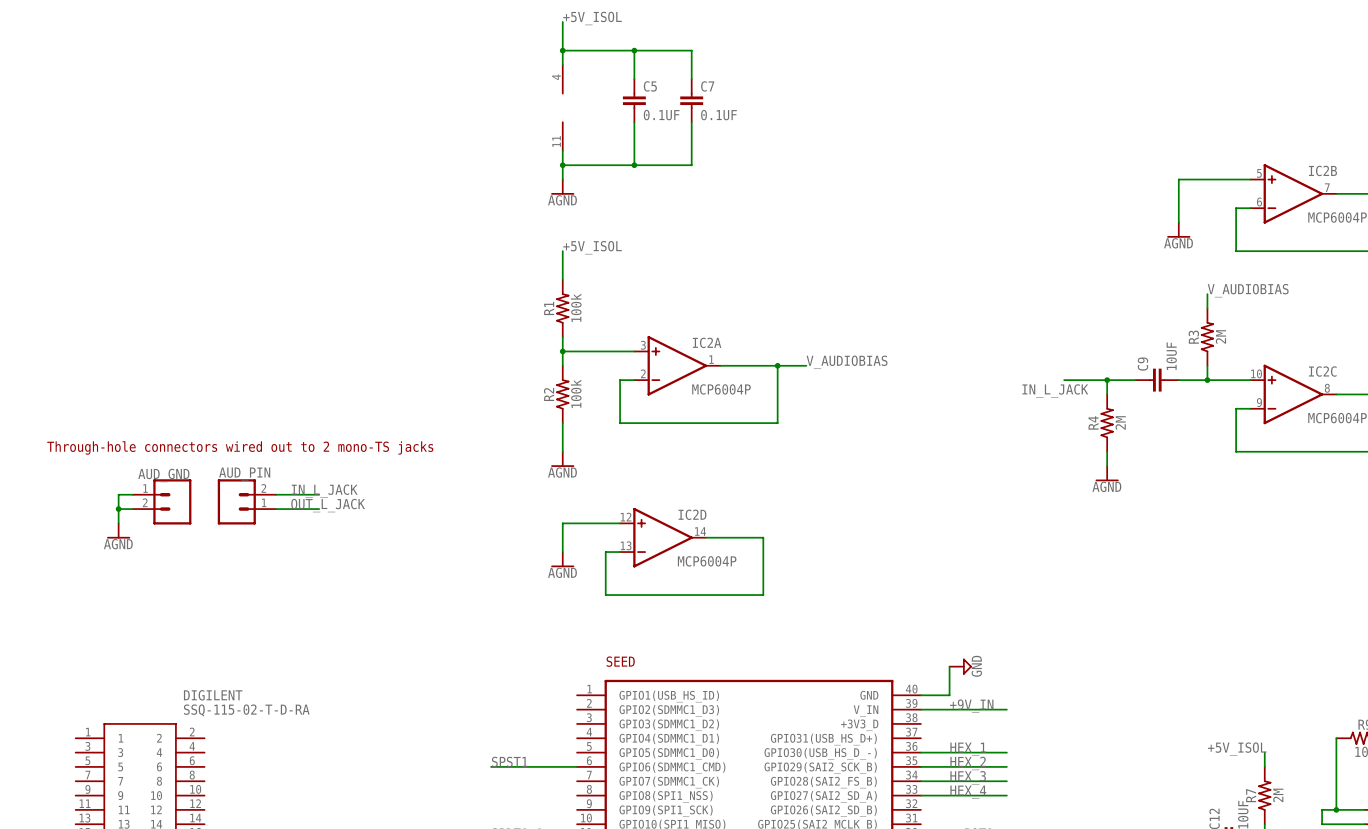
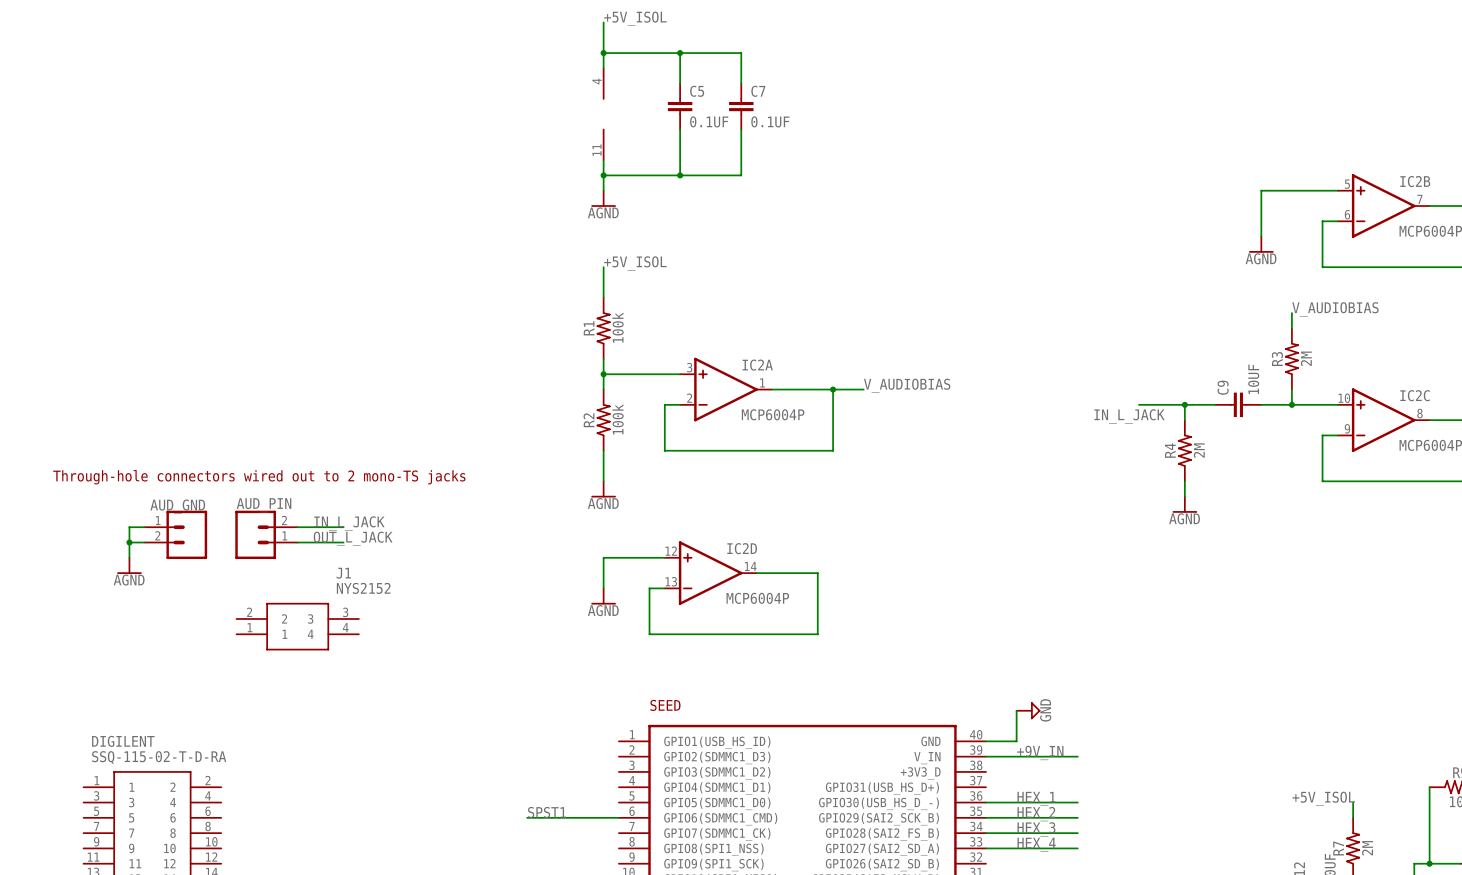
J1: none -> NYS2152 (297, 626)
DIGILENT name position: DIGILENT (213, 695) -> DIGILENT (123, 741)
DIGILENT value position: SSQ-115-02-T-D-RA (246, 710) -> SSQ-115-02-T-D-RA (159, 757)

